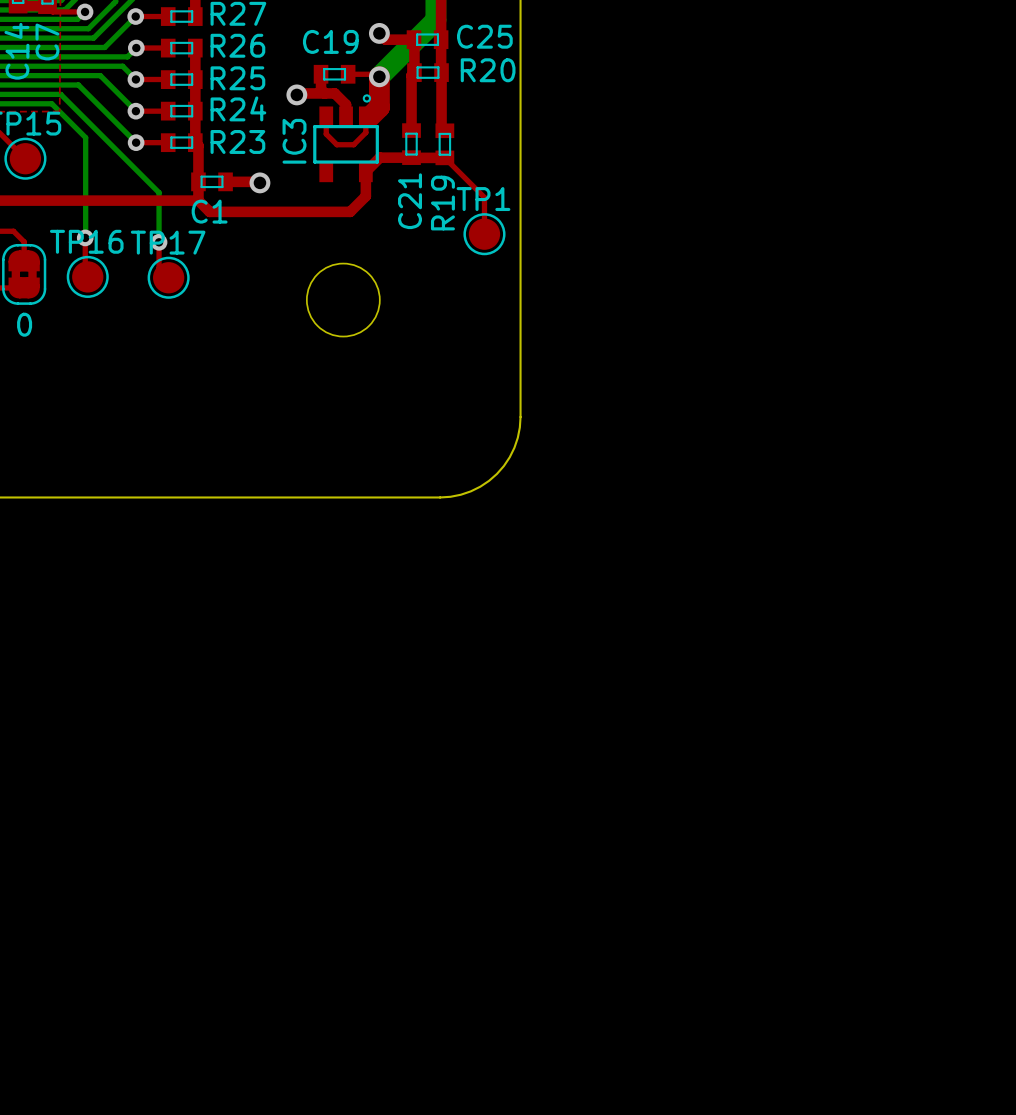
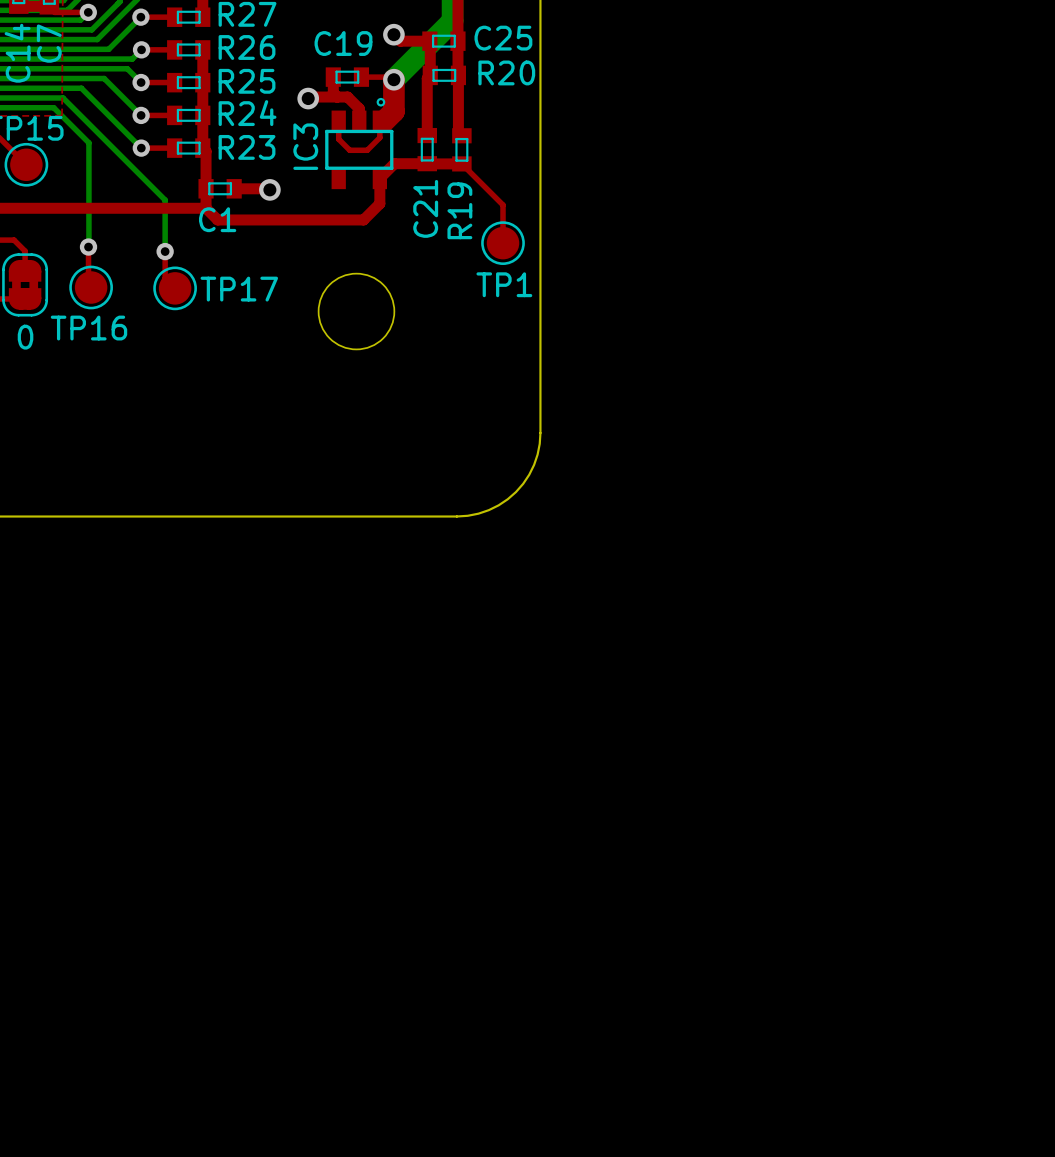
TP1 name position: TP1 (483, 199) -> TP1 (504, 284)
TP16 name position: TP16 (86, 241) -> TP16 (88, 328)
TP17 name position: TP17 (168, 242) -> TP17 (239, 289)

